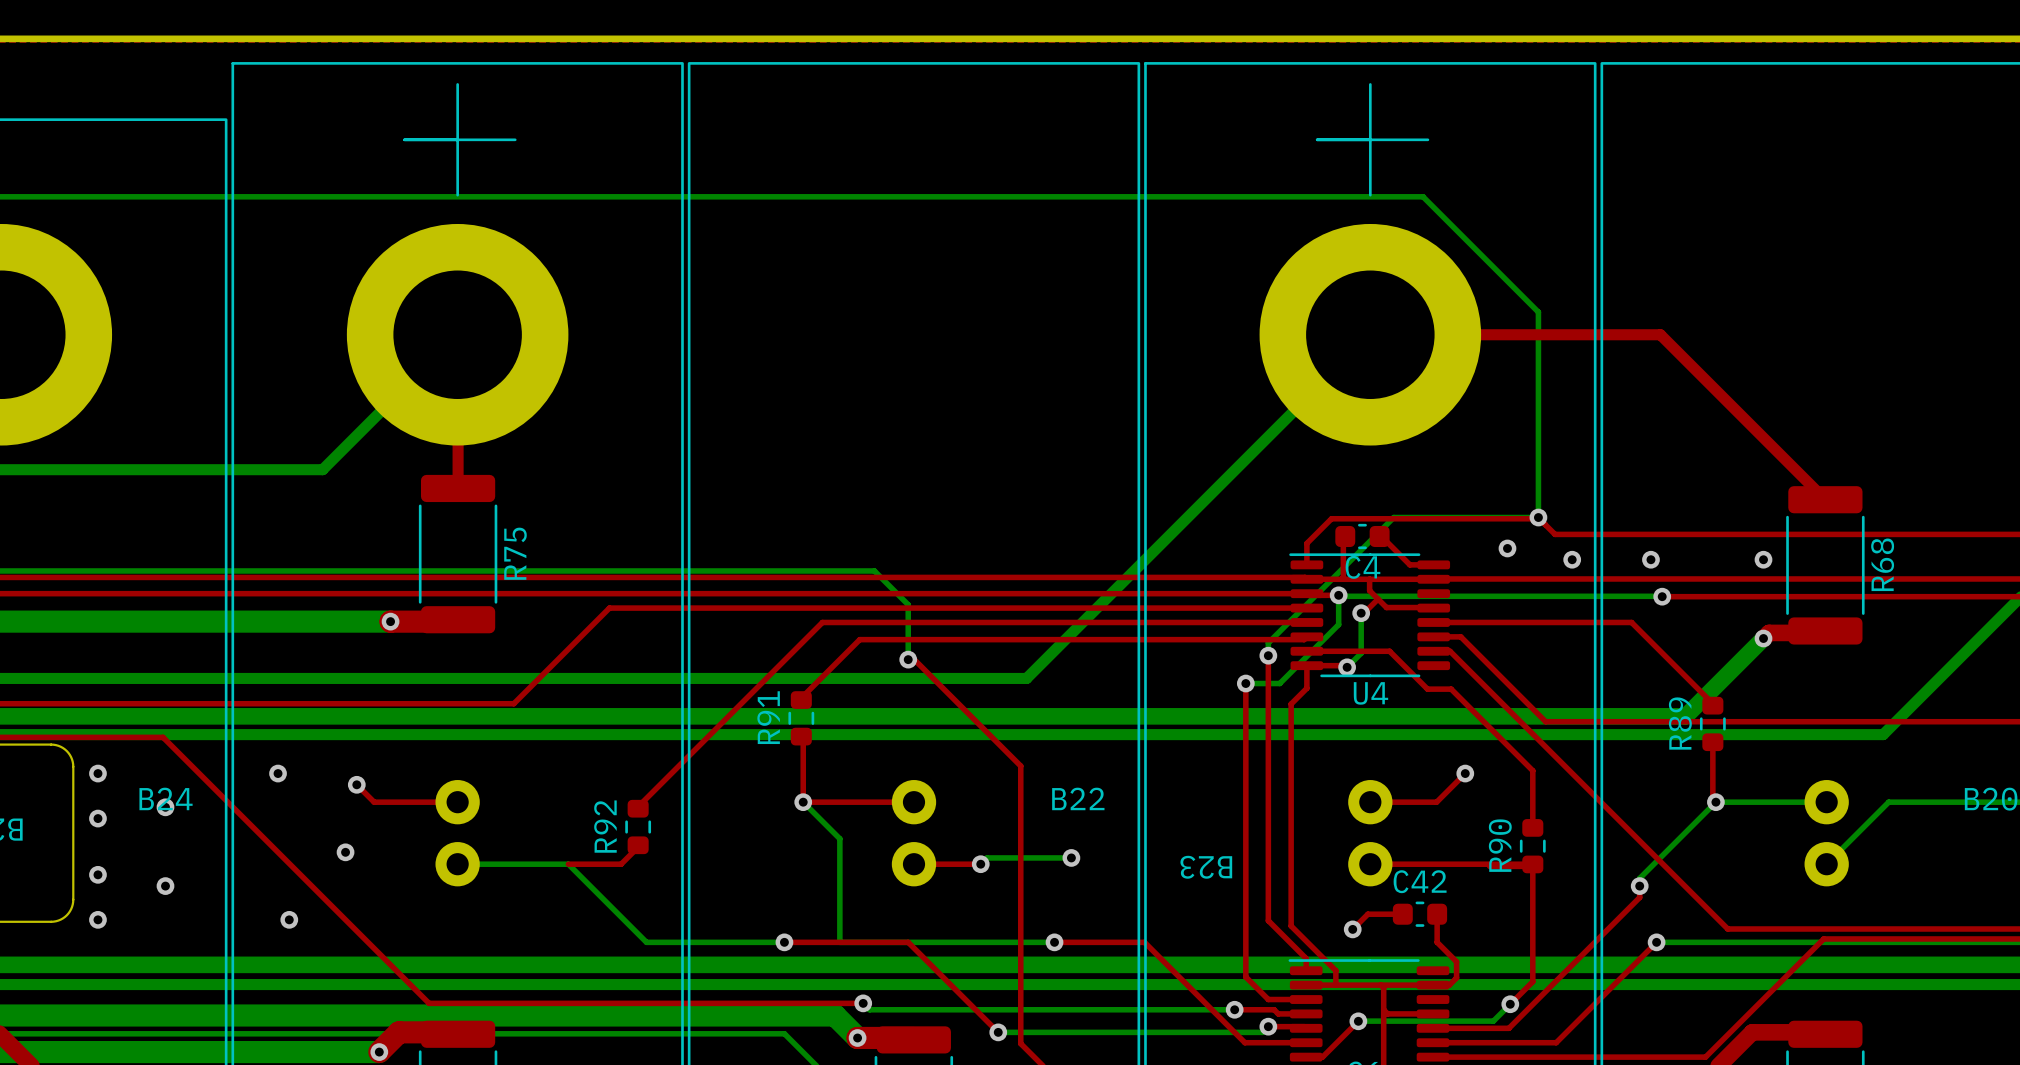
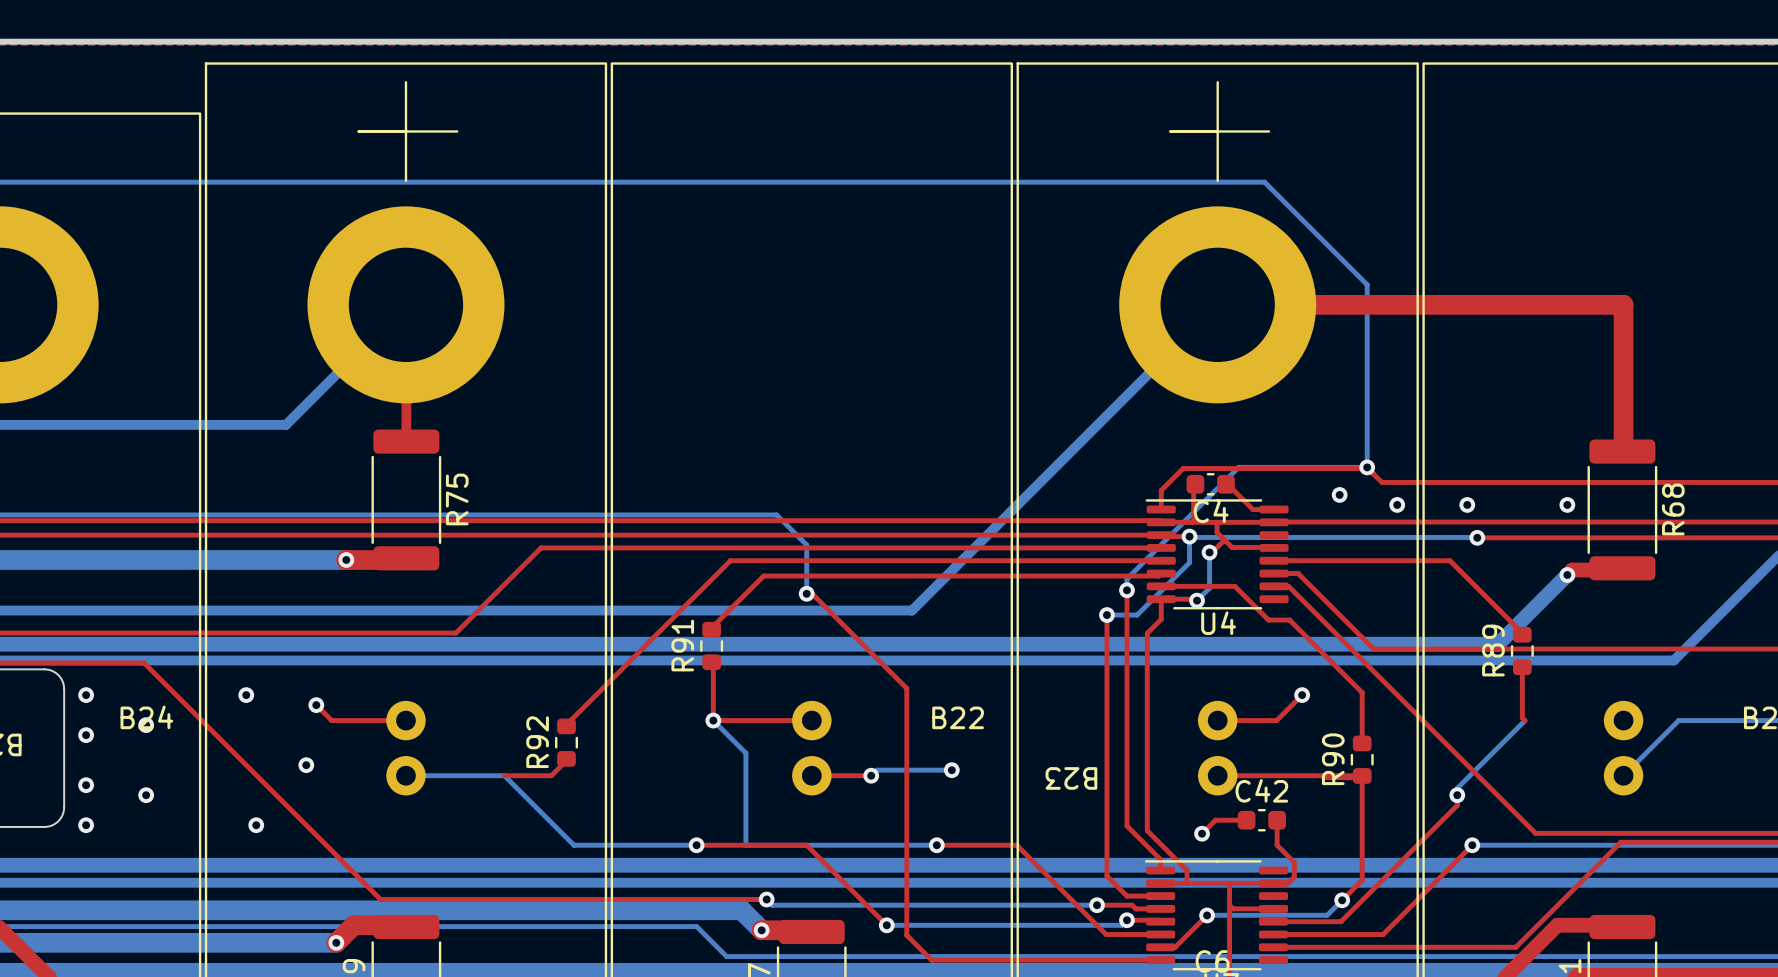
top track width: thin (1370, 334) (1660, 334) -> thick (1217, 304) (1475, 304)
top track: (1660, 334) (1825, 499) -> (1475, 304) (1623, 304) (1623, 448)
bottom track: (1715, 802) (1826, 802) -> none
via: (1715, 802) -> none

